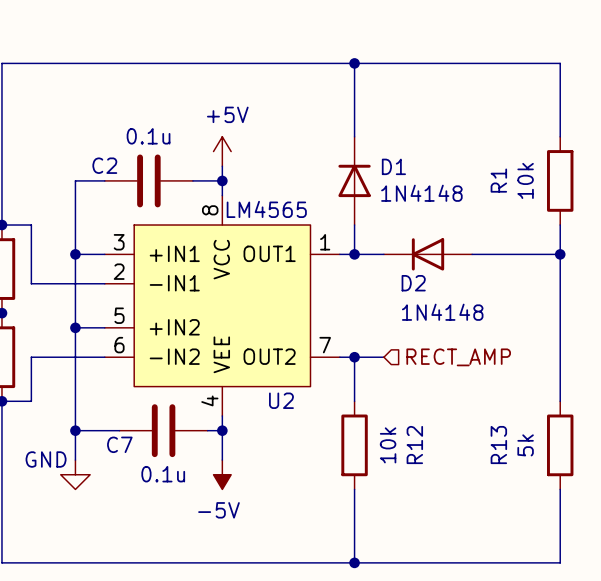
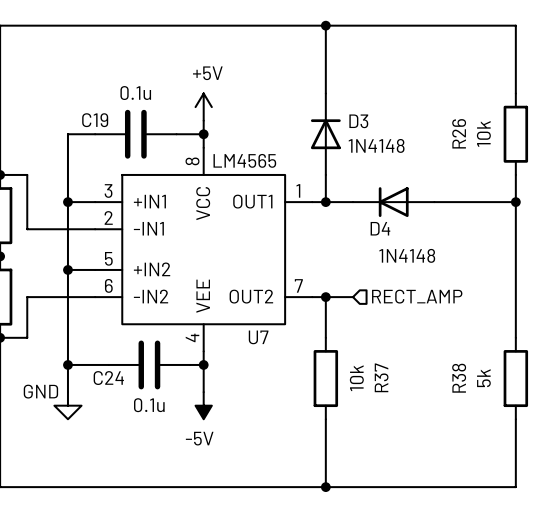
C2 name: C2 (104, 165) -> C19 (95, 120)
D1 name: D1 (393, 166) -> D3 (358, 121)
R1 name: R1 (498, 180) -> R26 (459, 133)
D2 name: D2 (413, 283) -> D4 (380, 228)
U2 name: U2 (281, 400) -> U7 (258, 337)
C7 name: C7 (119, 444) -> C24 (108, 378)
R12 name: R12 (414, 445) -> R37 (381, 377)
R13 name: R13 (498, 445) -> R38 (459, 378)

